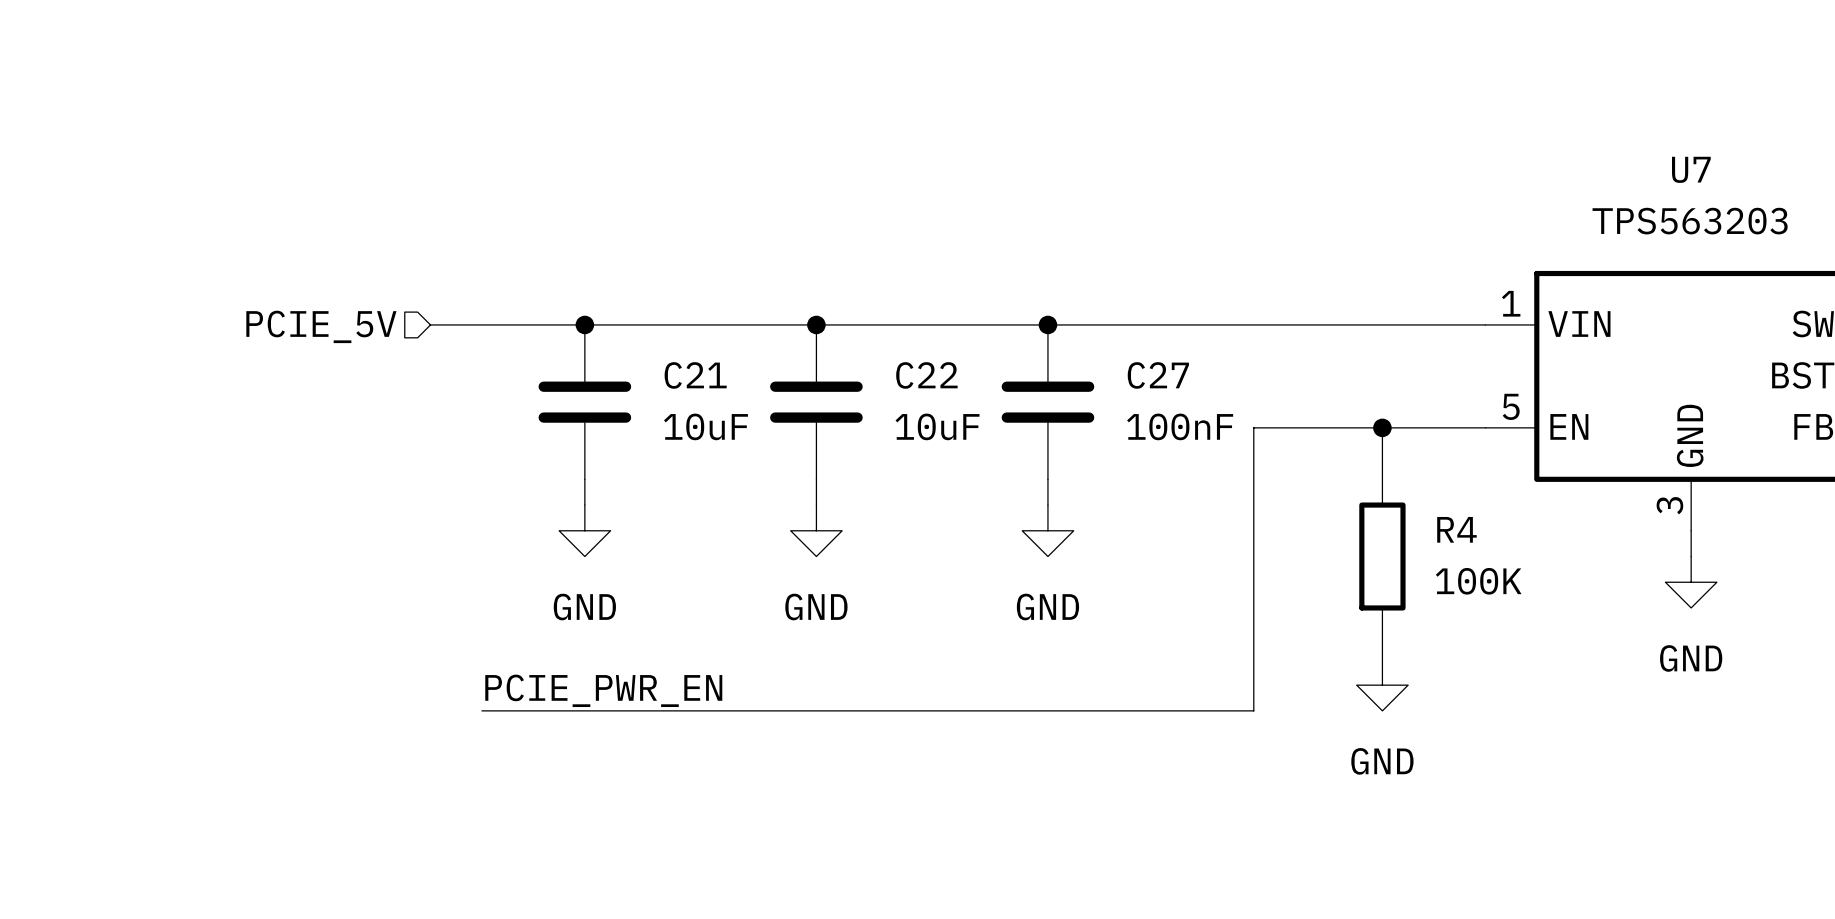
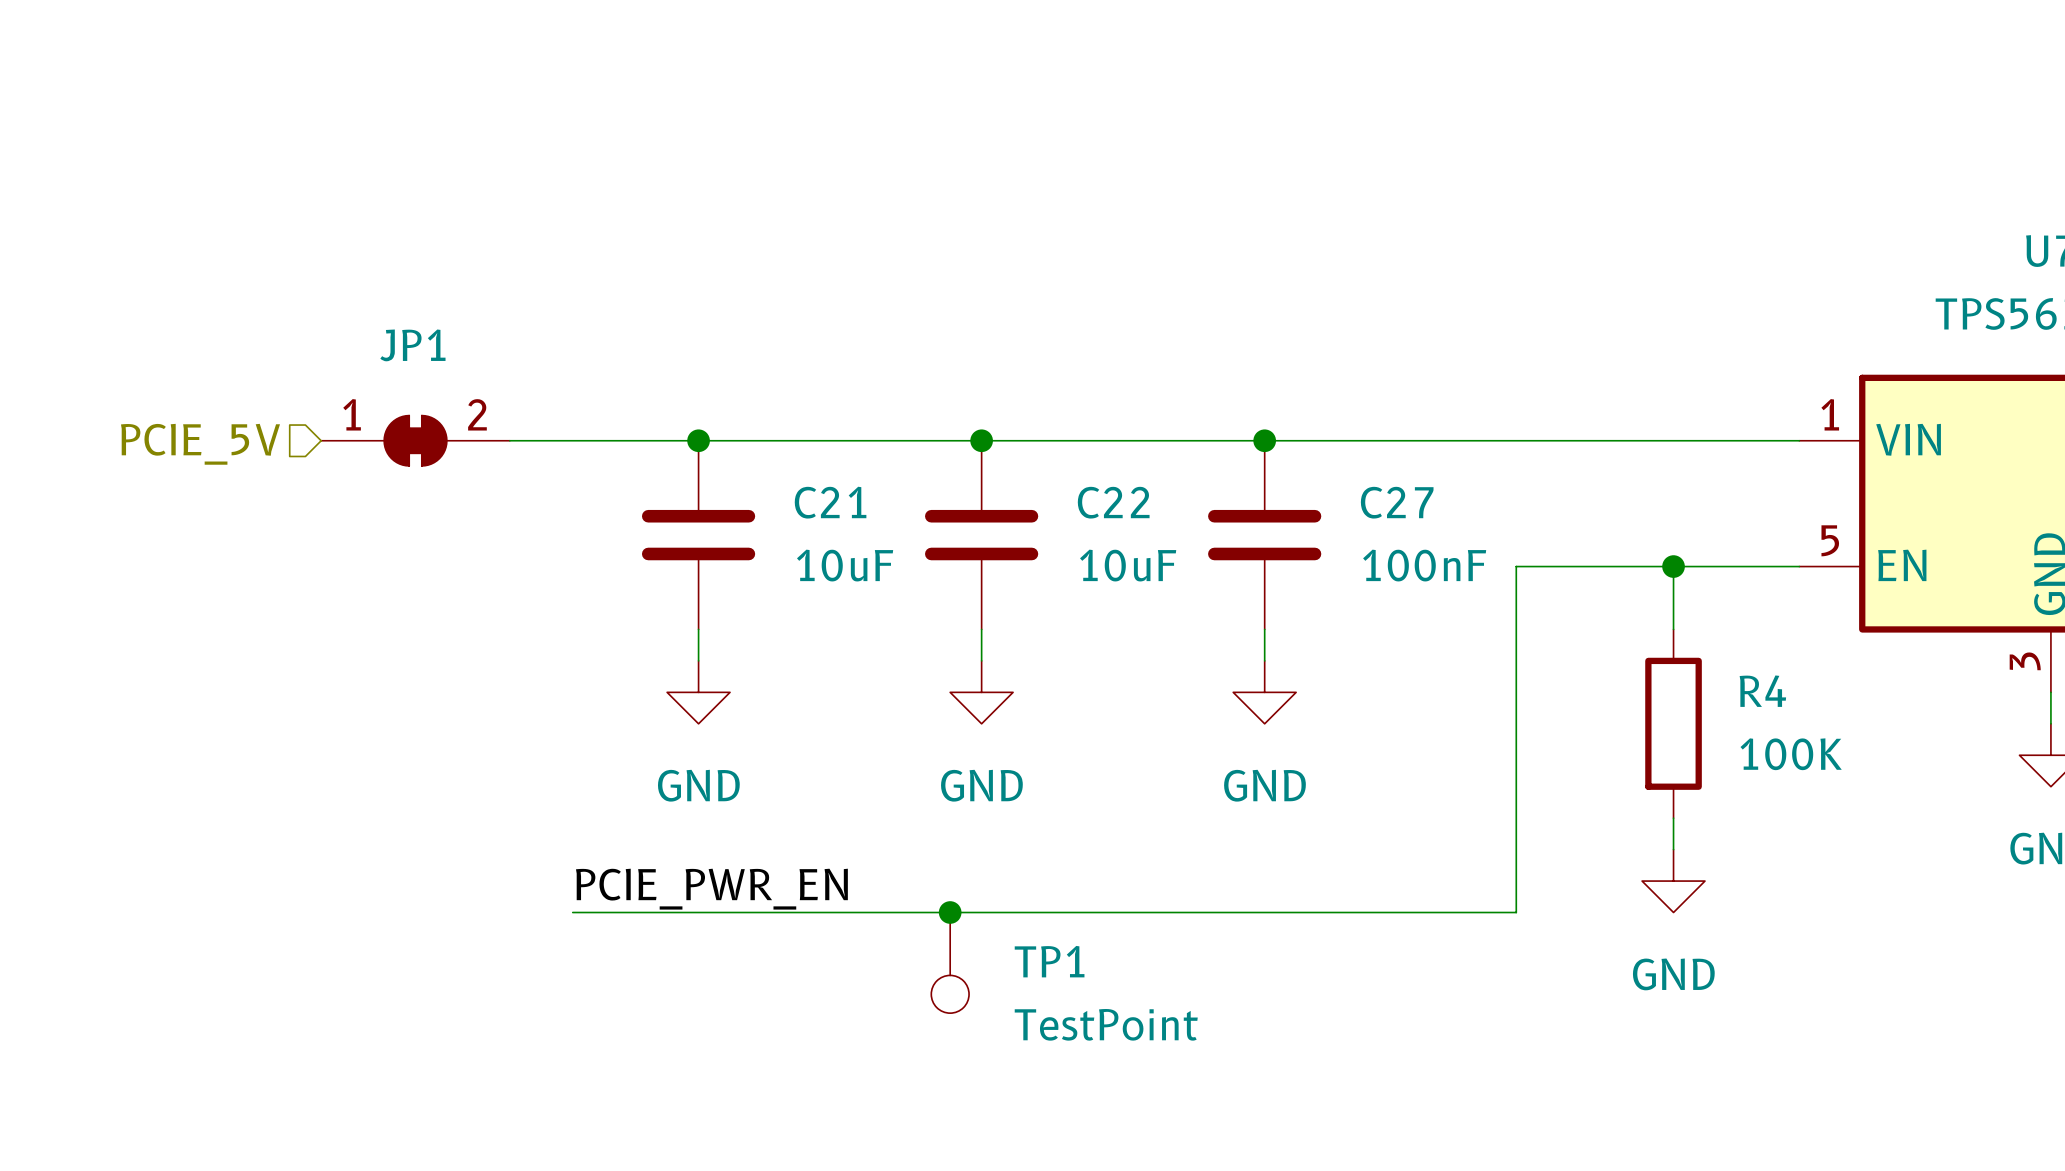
JP1: none -> (415, 440)
hierarchical label position: PCIE_5V (321, 326) -> PCIE_5V (200, 444)
junction: none -> (950, 912)
TP1: none -> TestPoint (950, 962)

